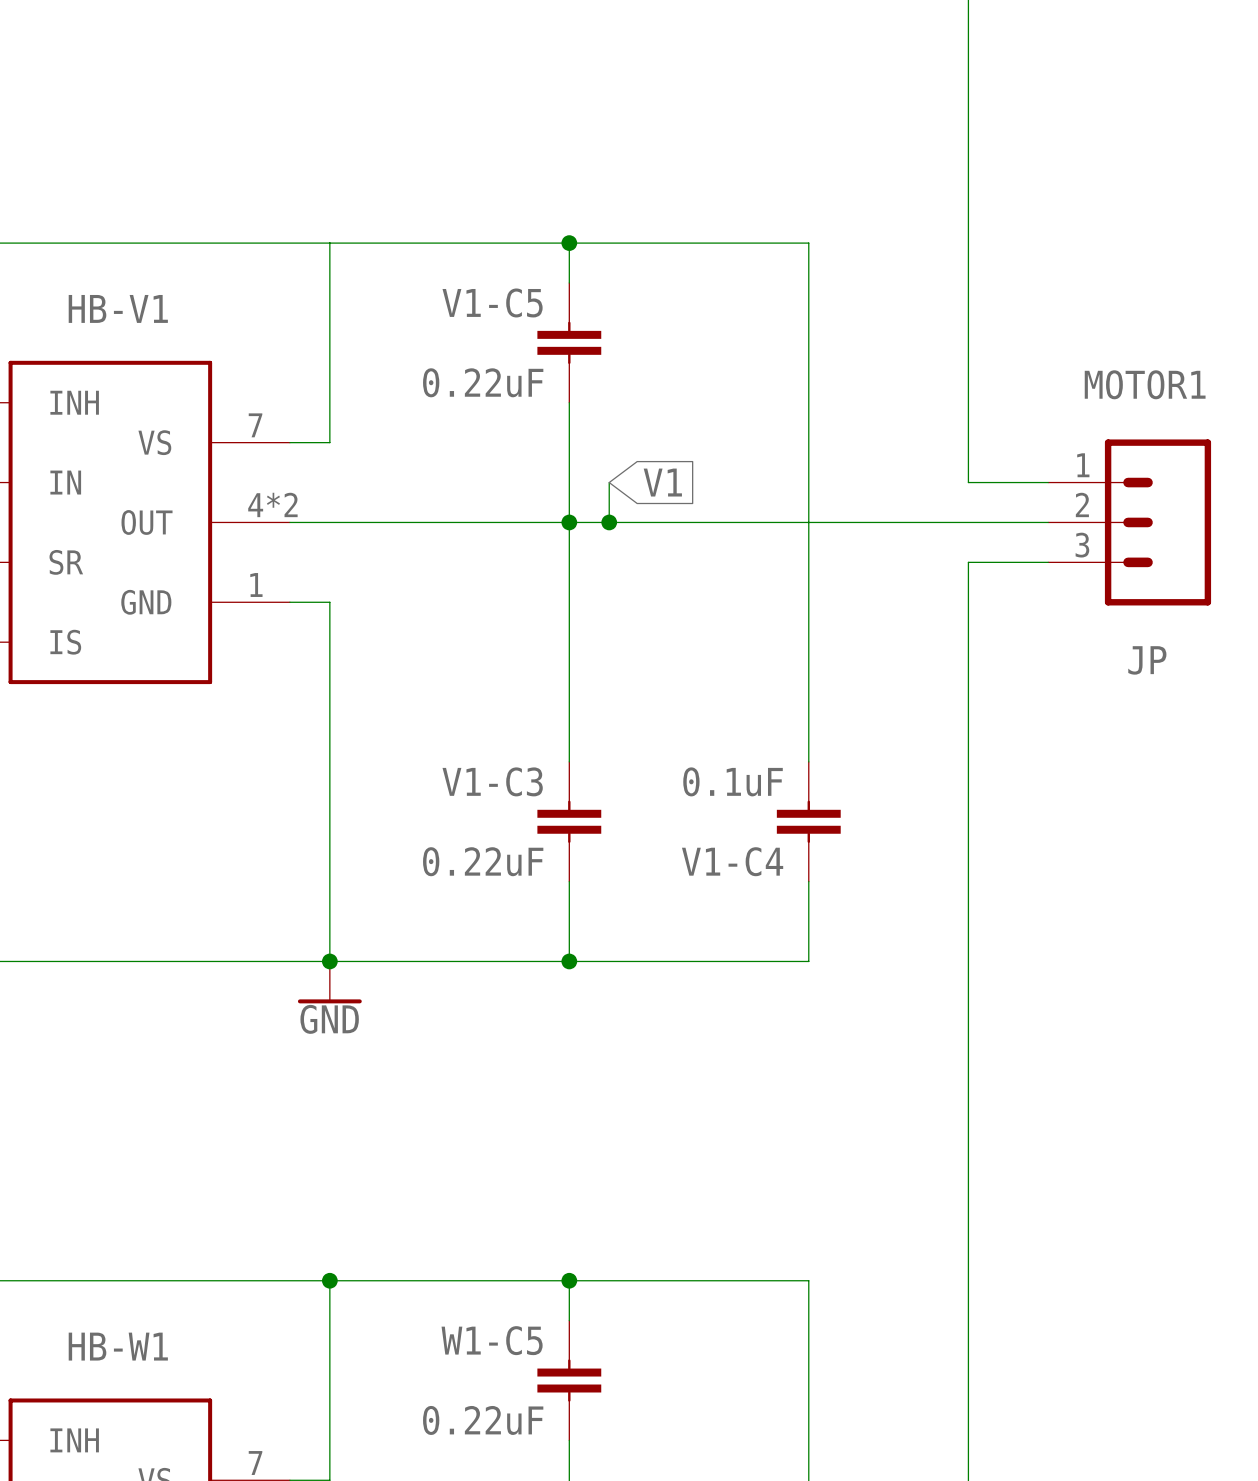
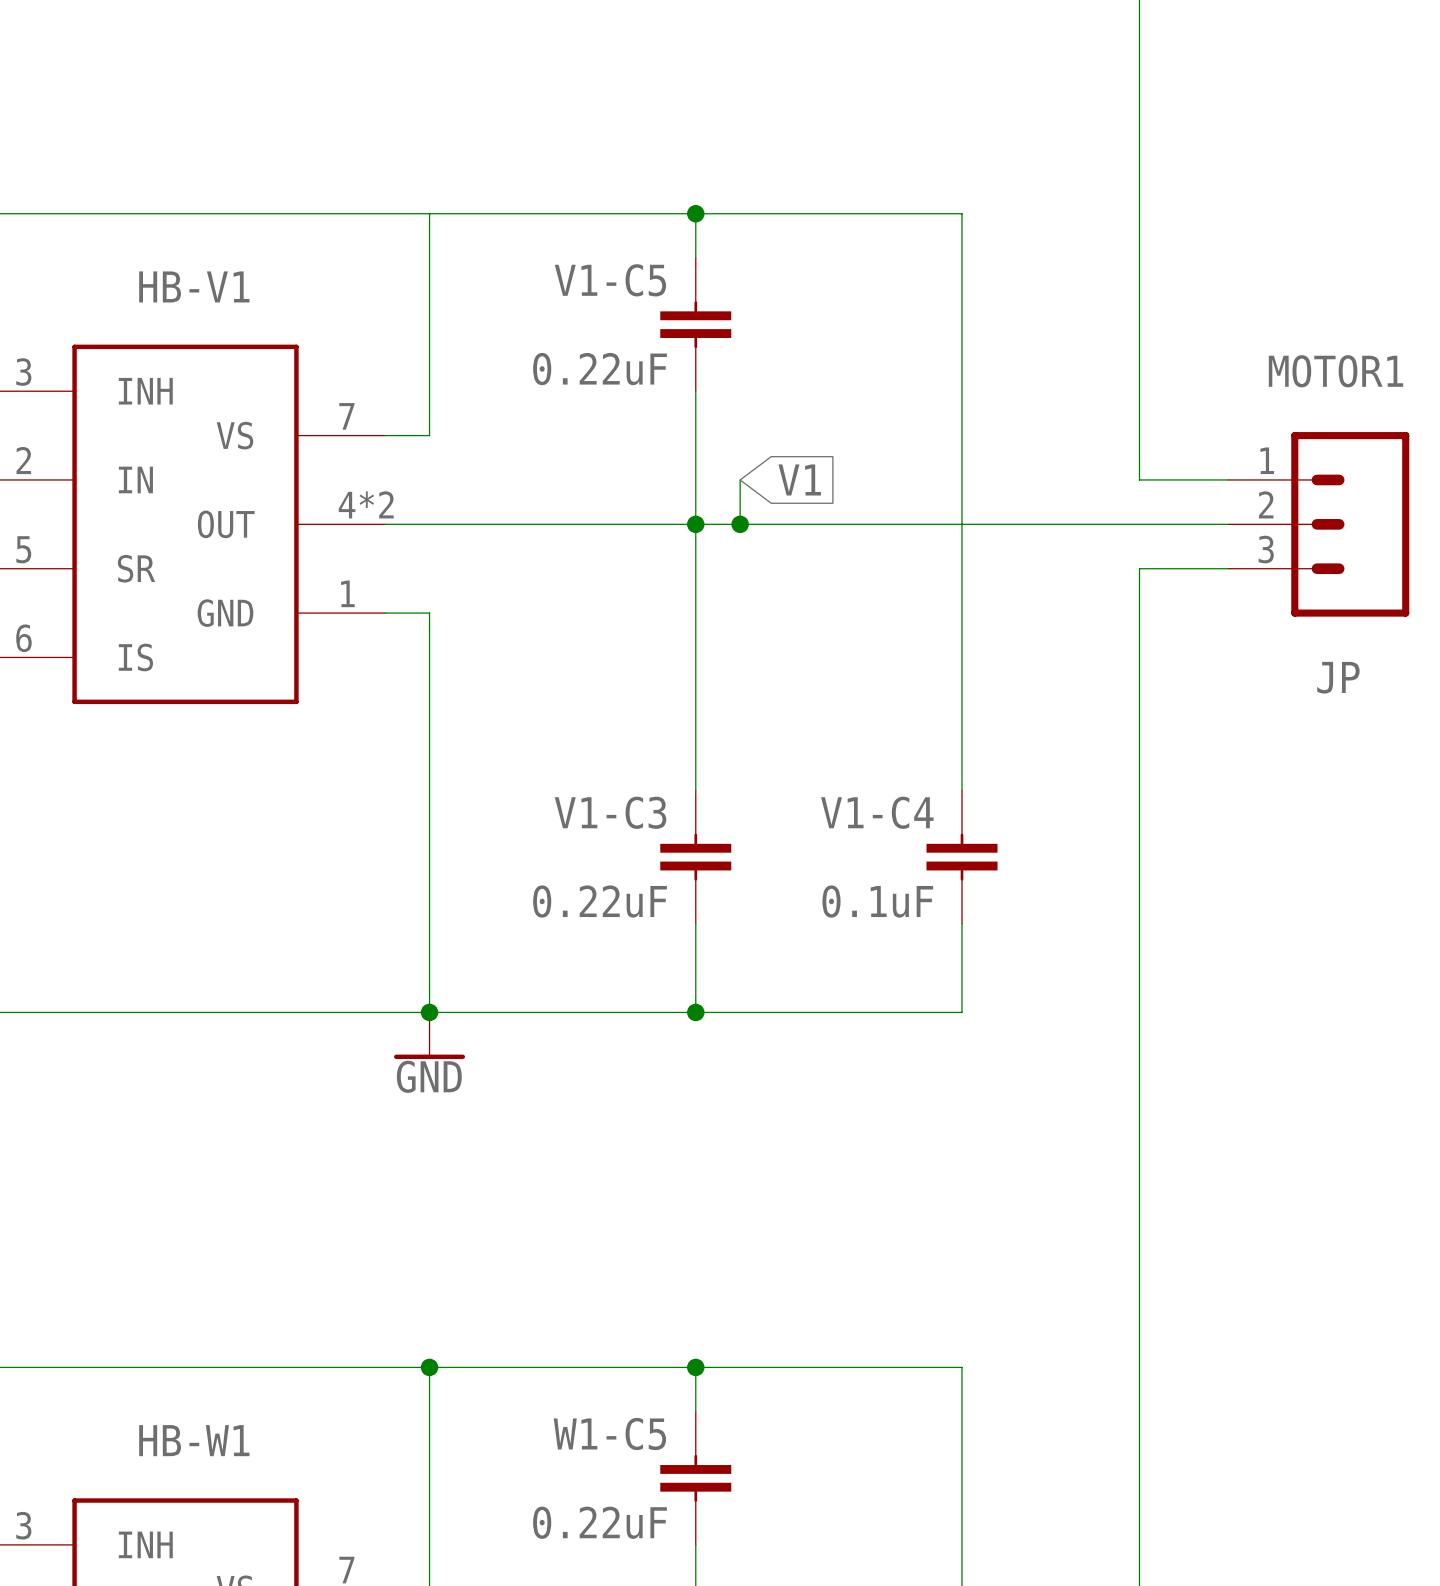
V1-C4 value position: 0.1uF (733, 781) -> 0.1uF (877, 901)
V1-C4 name position: V1-C4 (732, 861) -> V1-C4 (877, 812)

